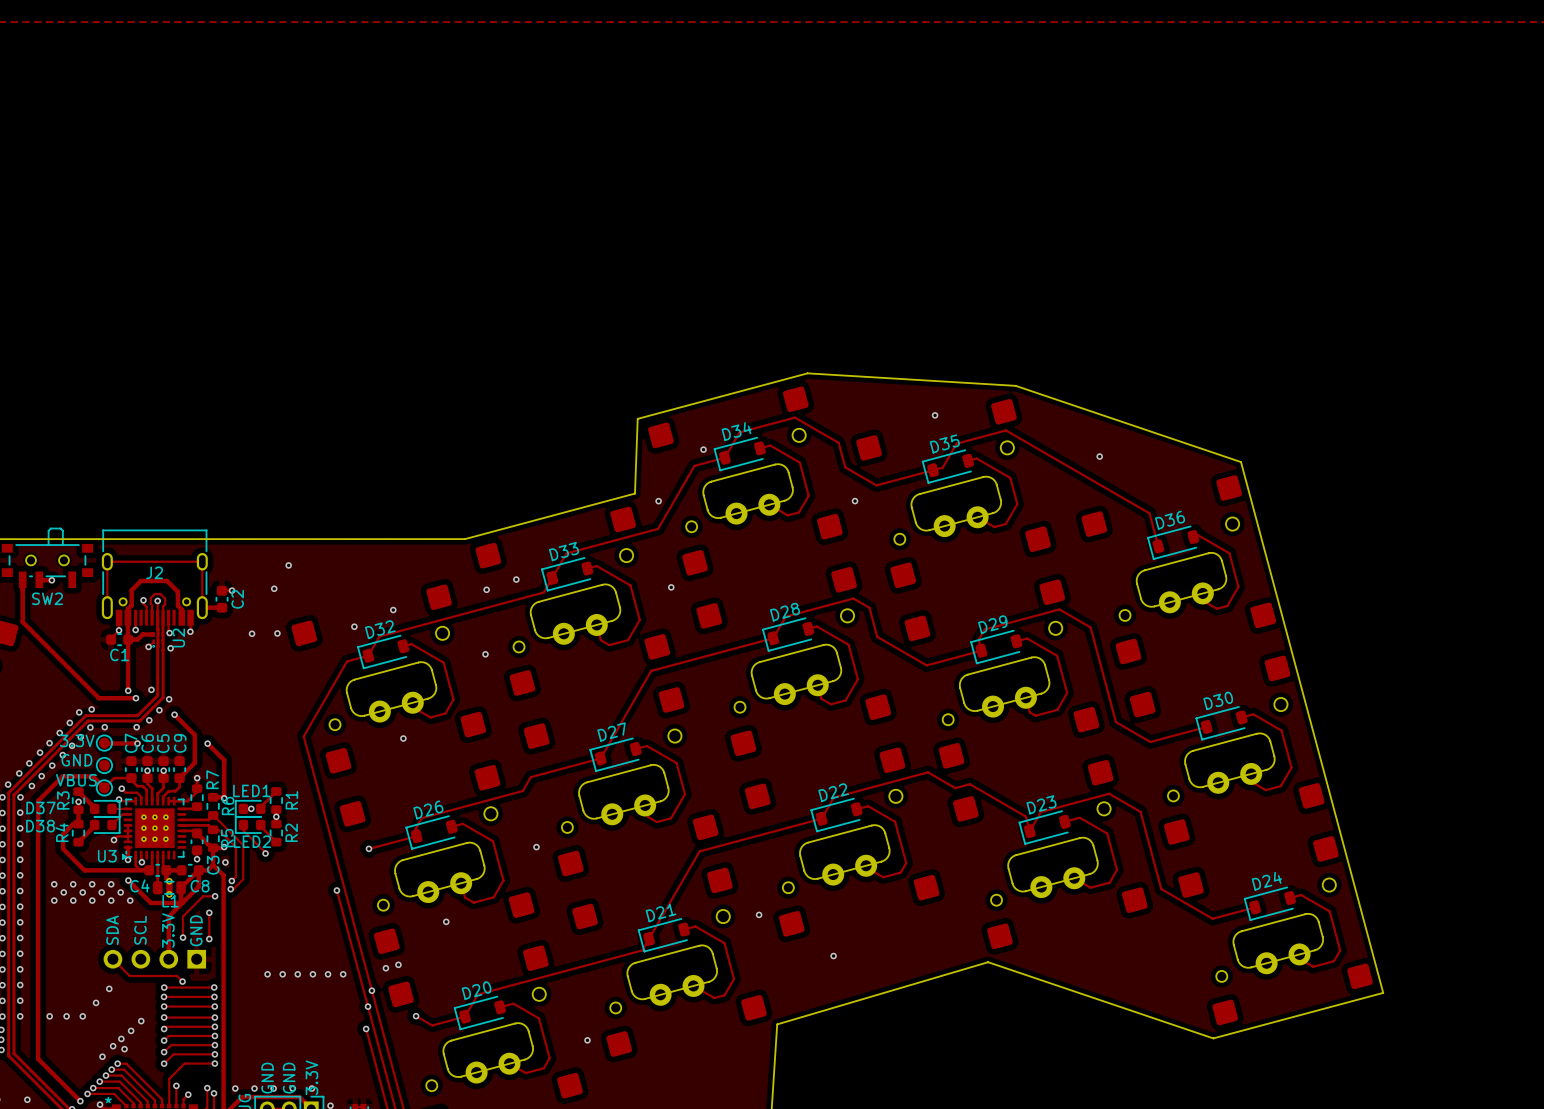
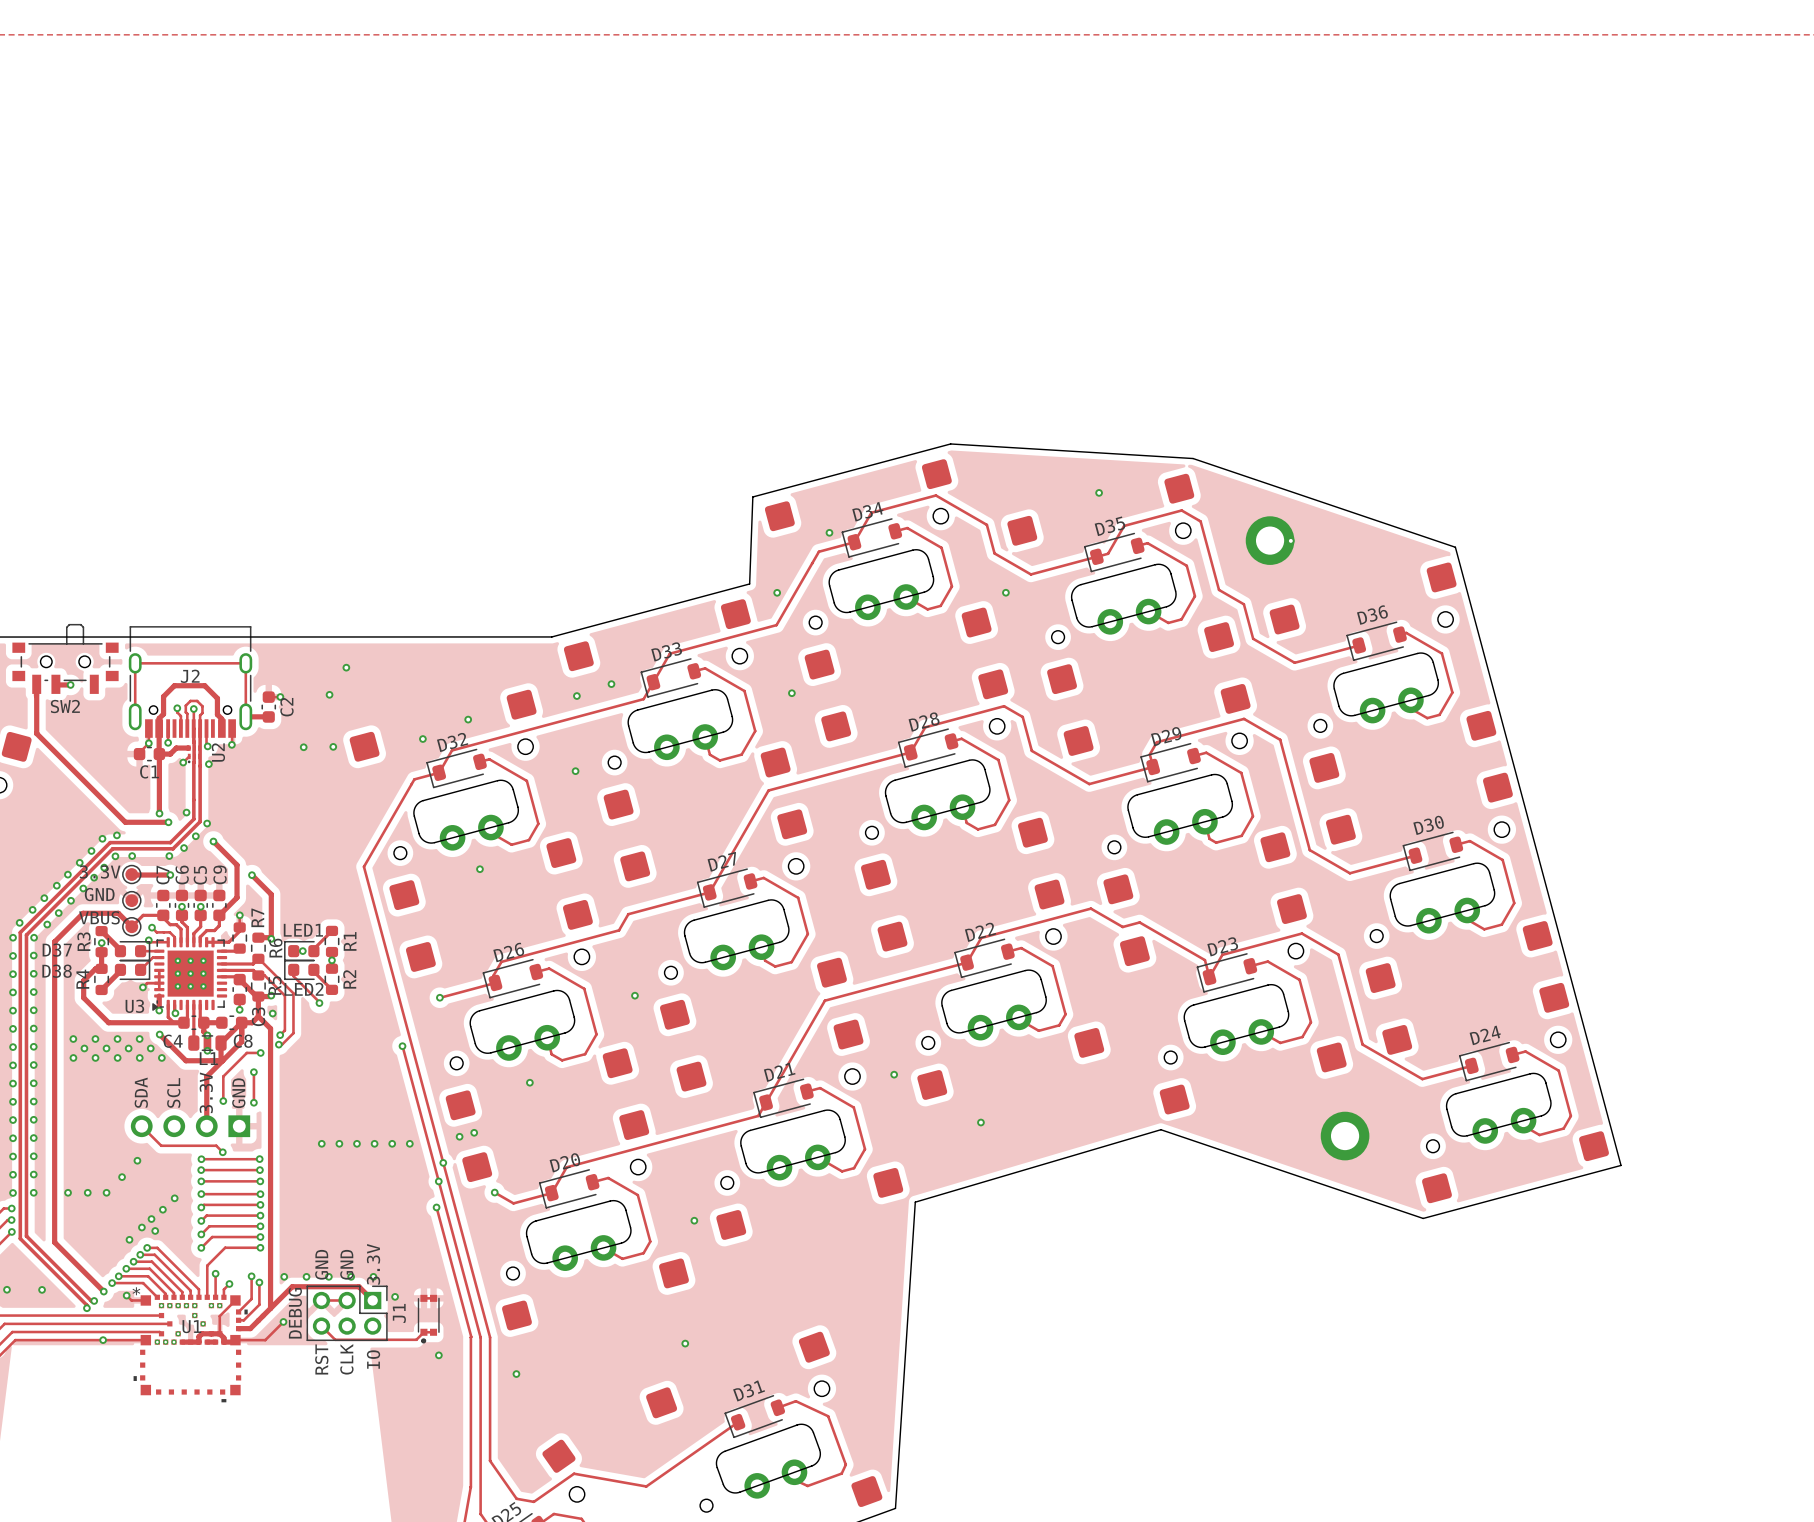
track: (1005, 430) (1149, 513) (1158, 546) -> (1181, 510) (1200, 521) (1218, 589) (1243, 604) (1253, 638) (1294, 662) (1359, 645)
part: none -> (1270, 540)
part: none -> (1345, 1136)

